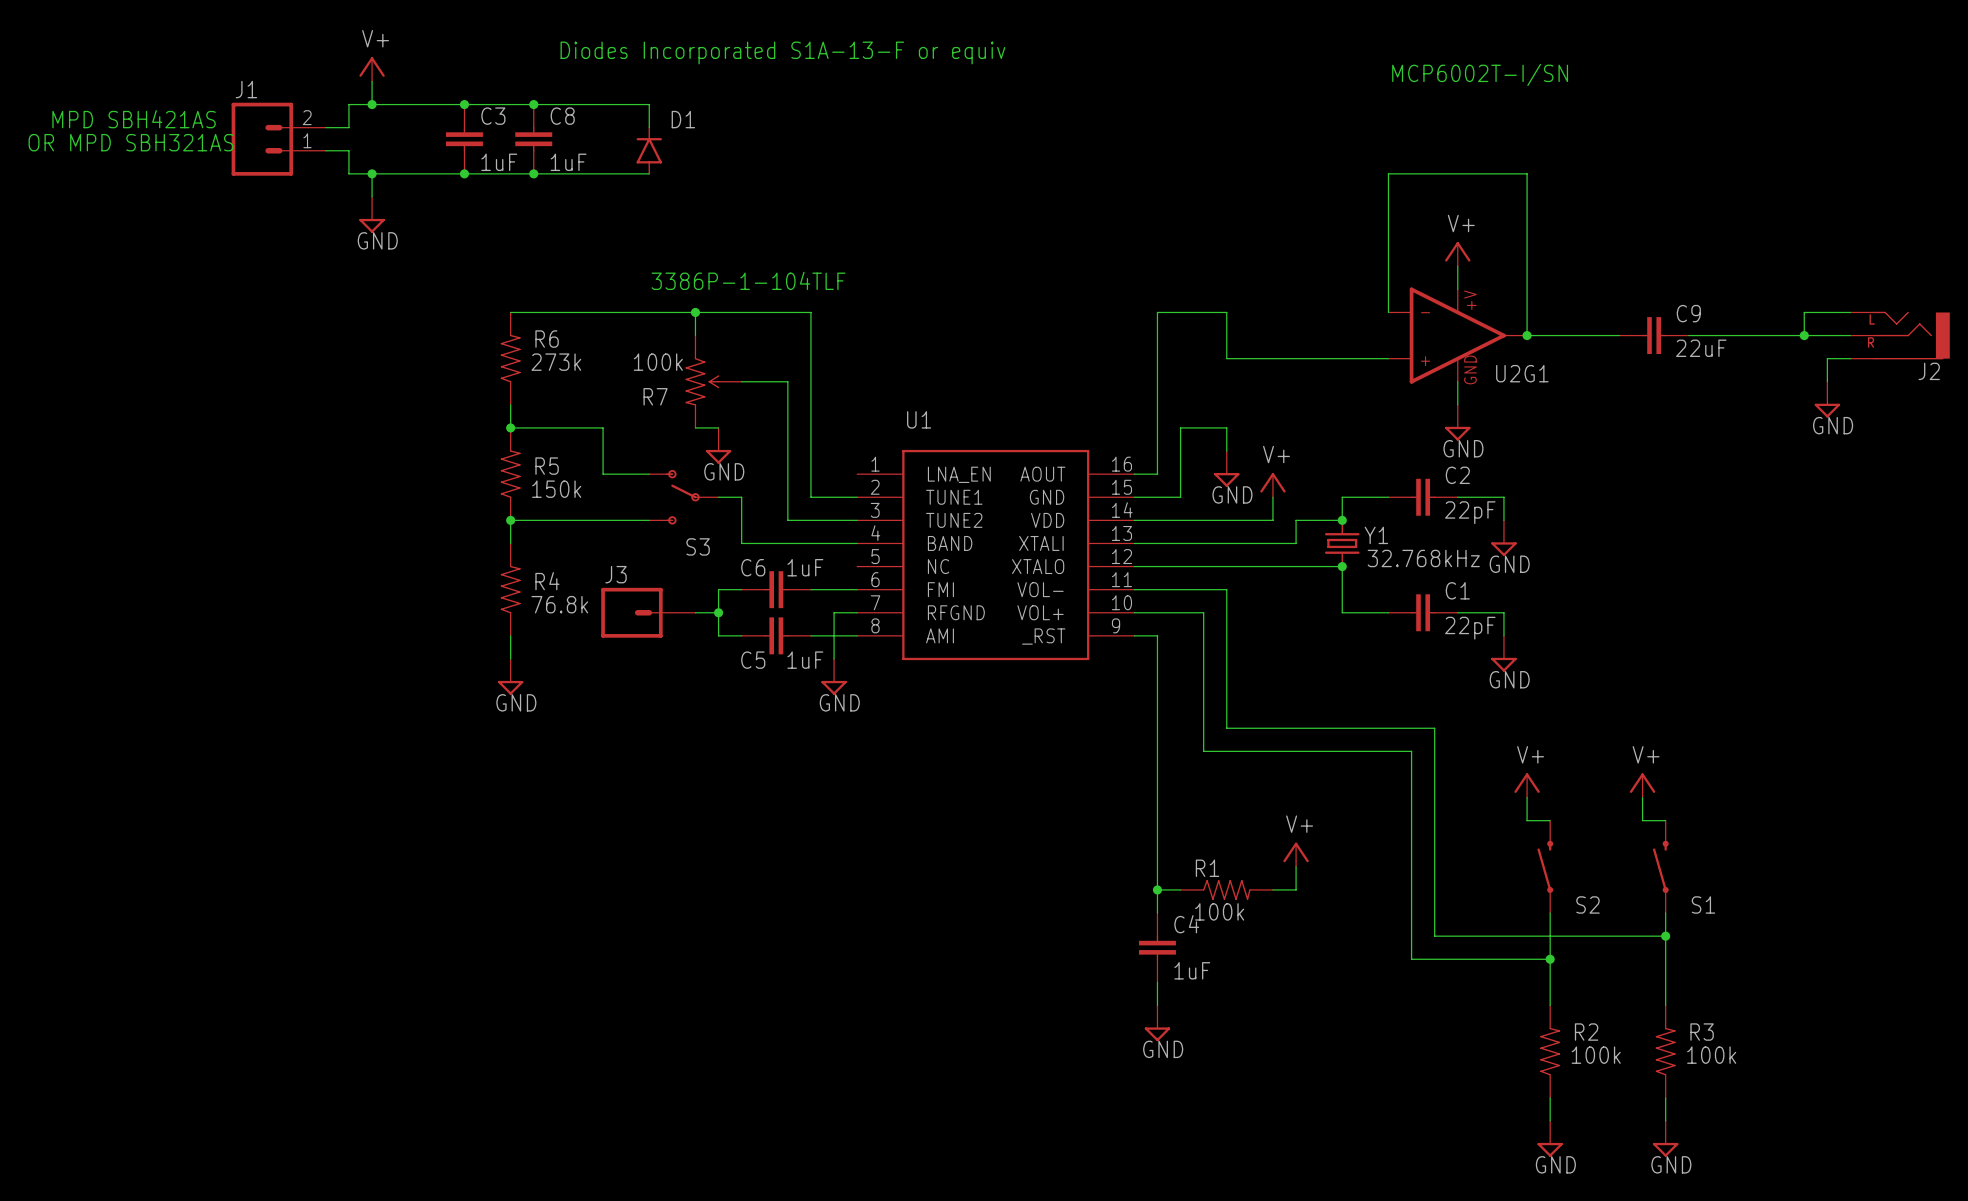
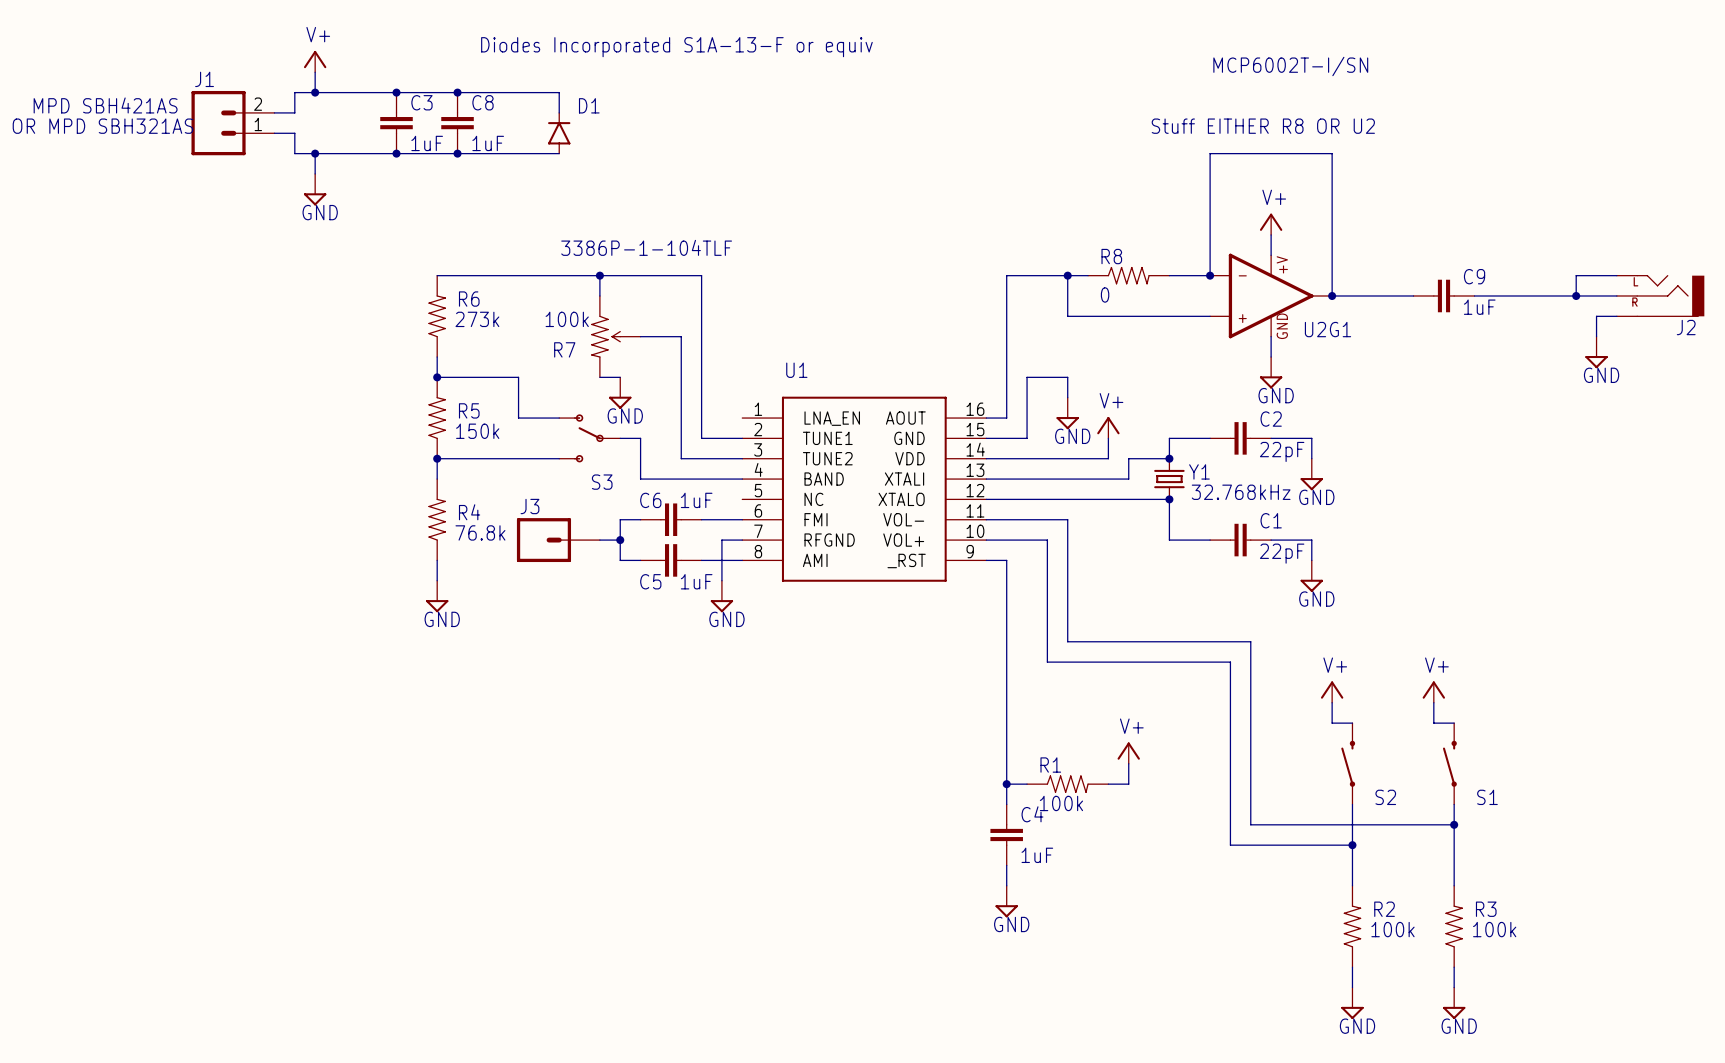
text: none -> Stuff EITHER R8 OR U2 (1263, 126)
wire: none -> (1067, 275) (1088, 275)
junction: none -> (1067, 275)
R8: none -> 0 (1128, 275)
wire: none -> (1169, 275) (1210, 275)
junction: none -> (1210, 275)
C9 value: 22uF (1701, 348) -> 1uF (1479, 307)

